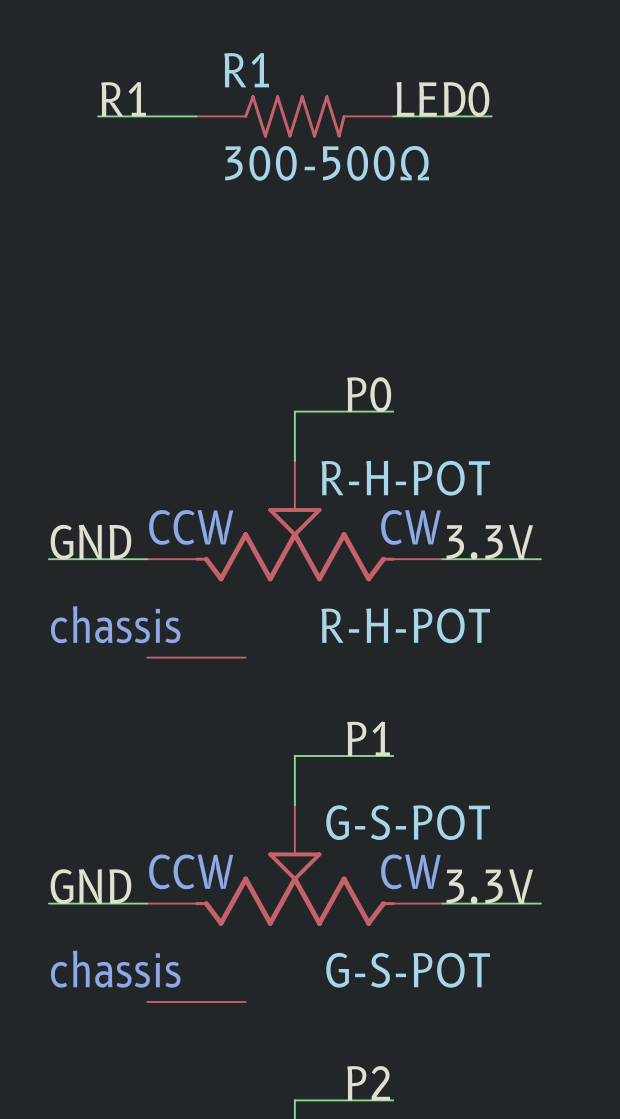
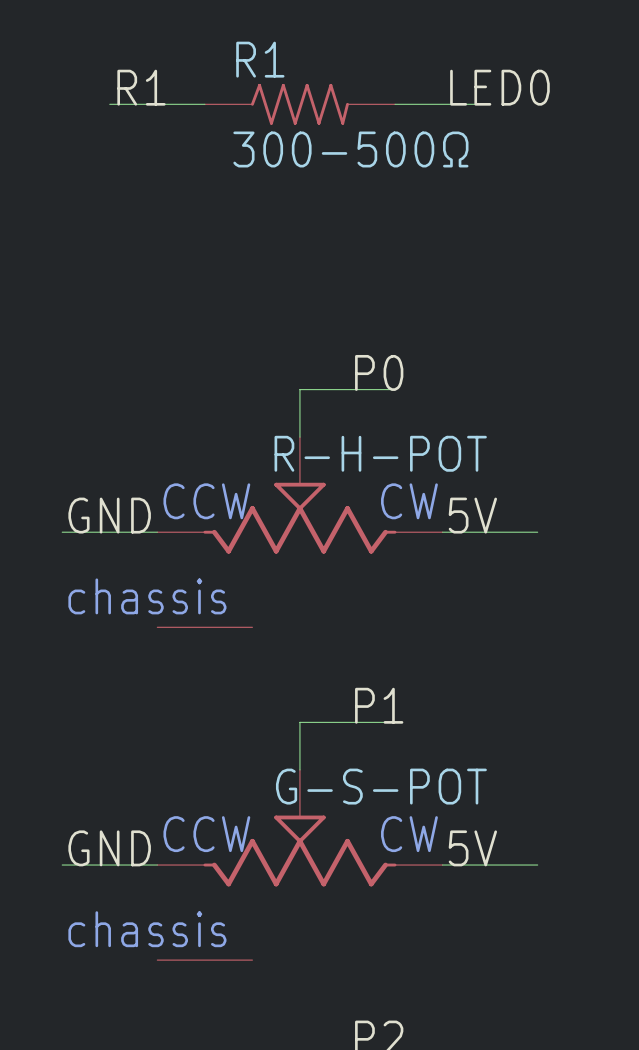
label position: LED0 (442, 99) -> LED0 (499, 87)
label: 3.3V (489, 542) -> 5V (472, 515)
R-H-POT value: R-H-POT (405, 625) -> none
label: 3.3V (489, 886) -> 5V (472, 848)
G-S-POT value: G-S-POT (408, 970) -> none

